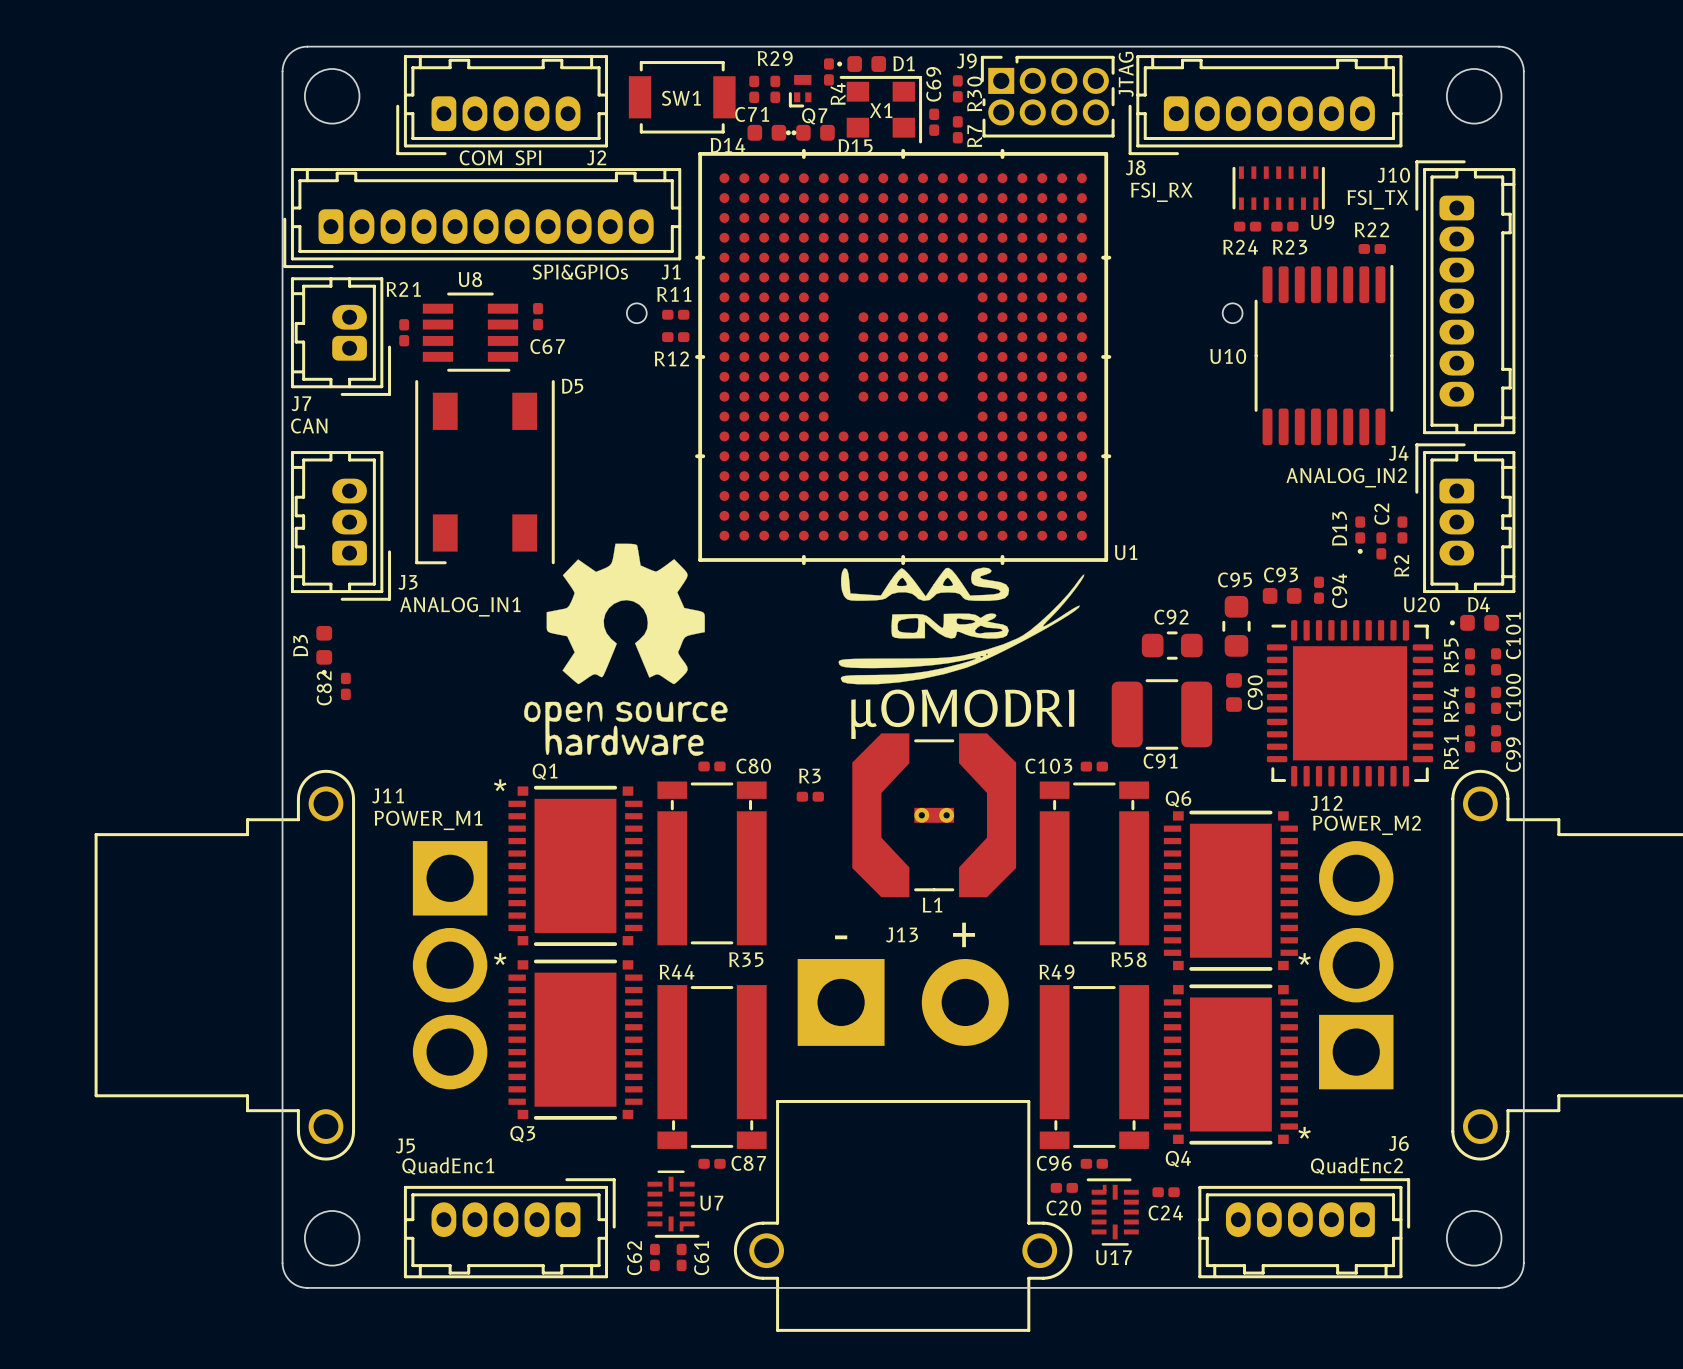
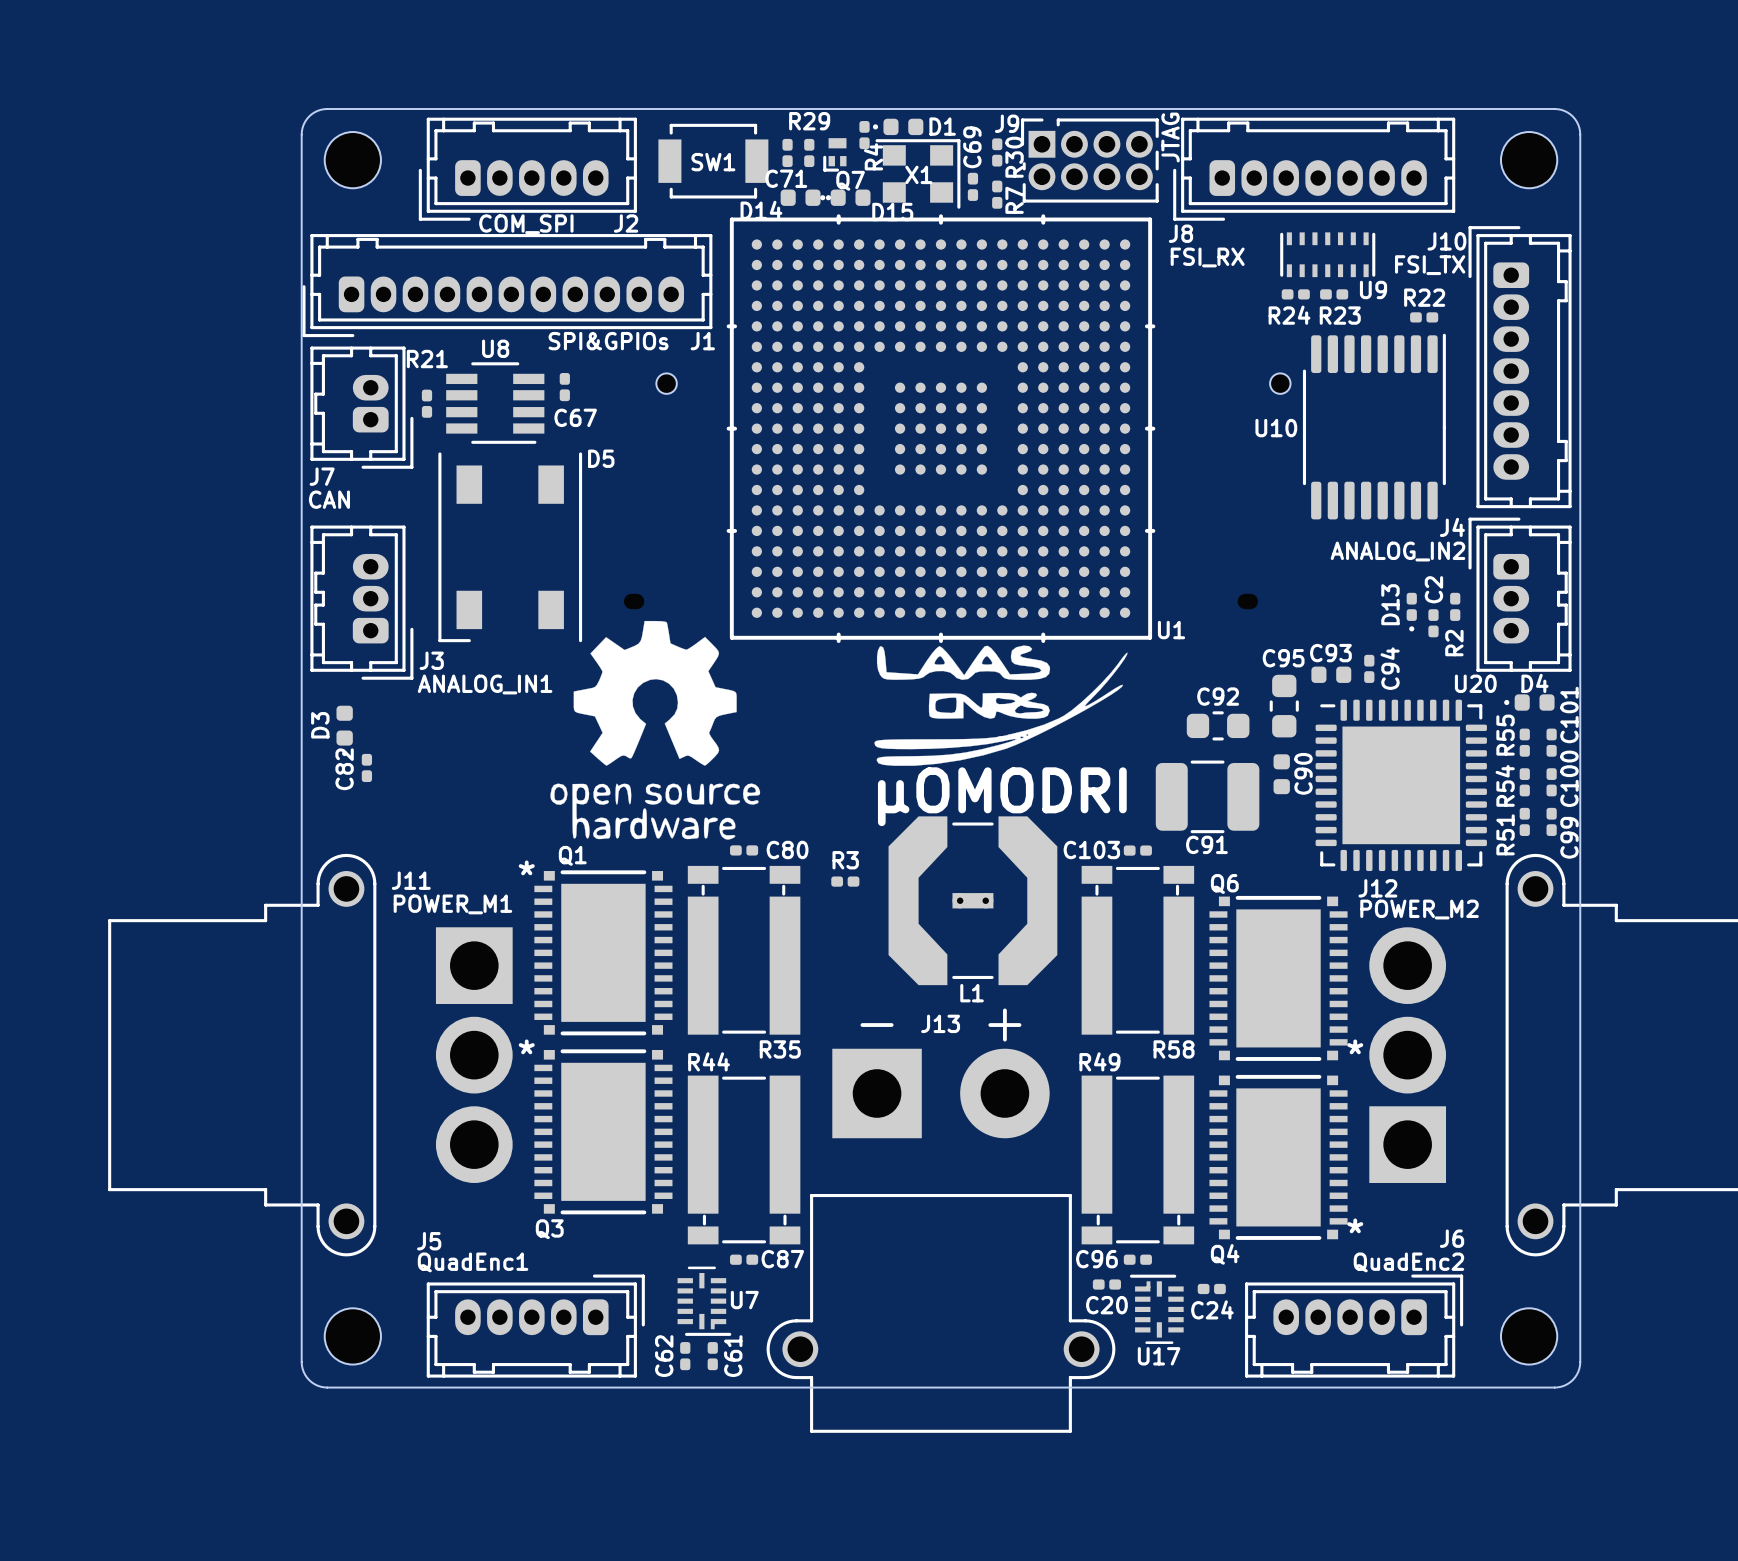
R11: (675, 314) -> none
R12: (675, 337) -> none

